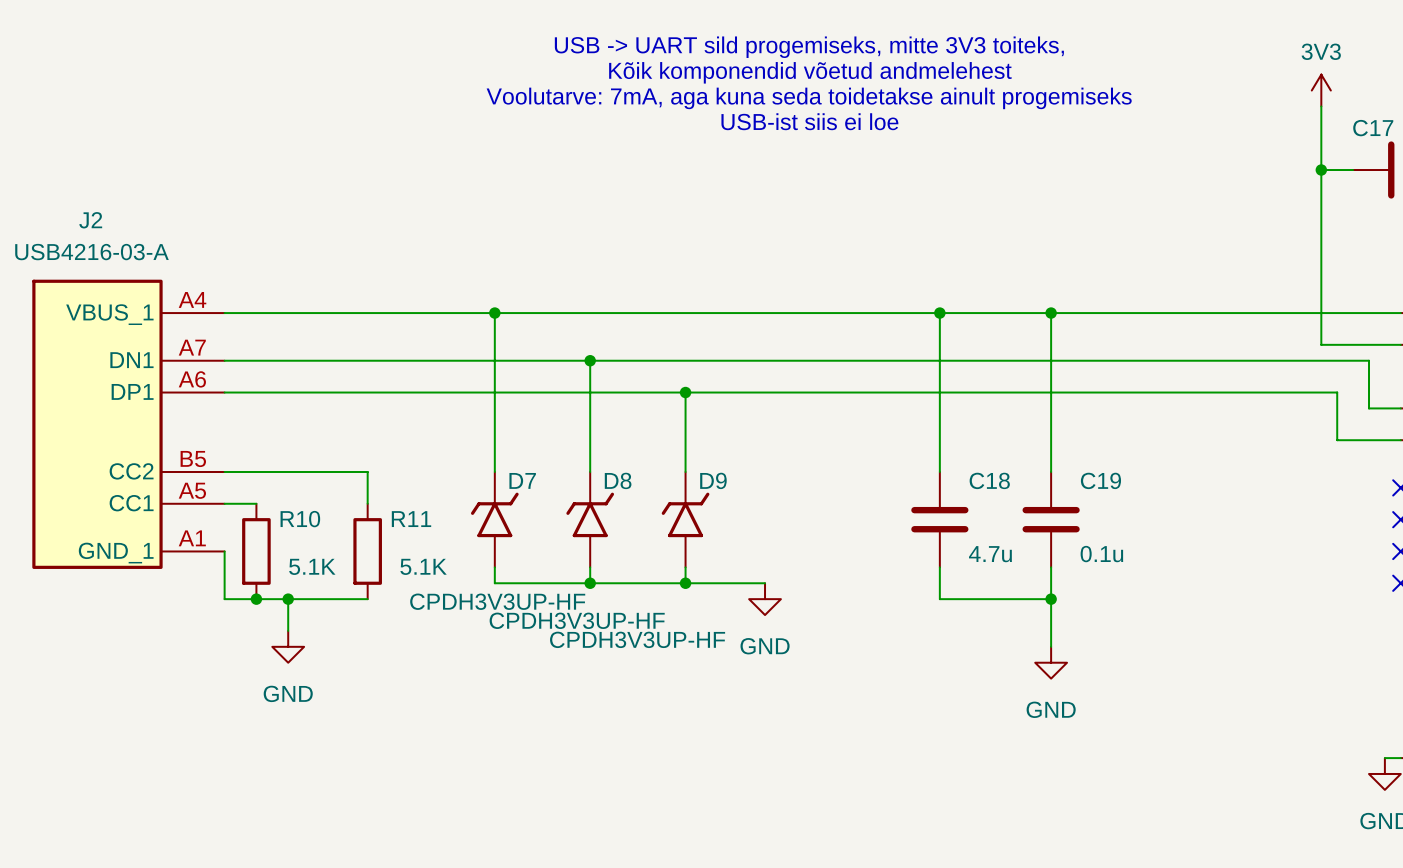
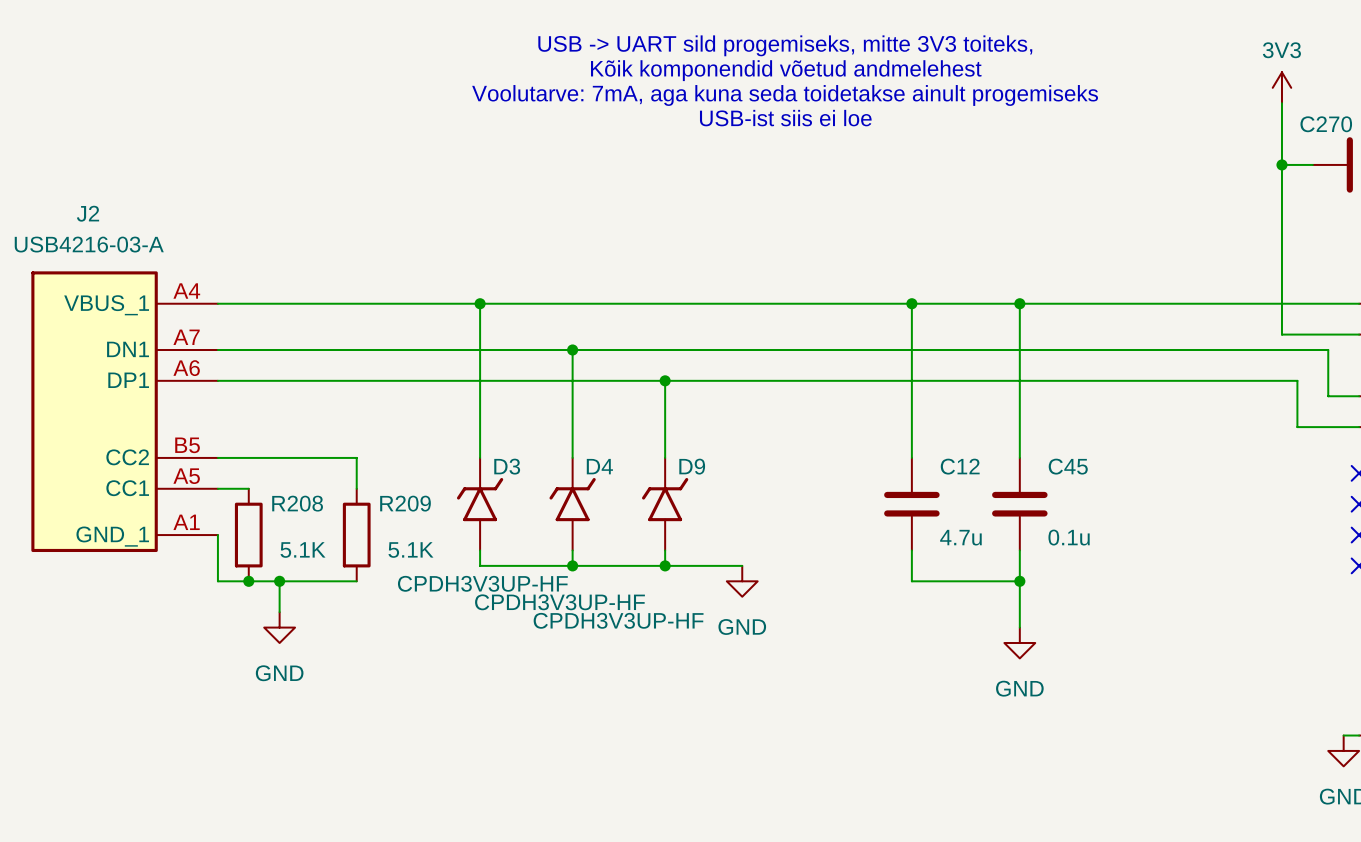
C17 name: C17 (1373, 128) -> C270 (1326, 124)
D7 name: D7 (522, 480) -> D3 (507, 466)
D8 name: D8 (618, 480) -> D4 (599, 466)
C18 name: C18 (989, 480) -> C12 (960, 466)
C19 name: C19 (1100, 480) -> C45 (1068, 466)
R10 name: R10 (300, 519) -> R208 (297, 503)
R11 name: R11 (411, 519) -> R209 (405, 503)

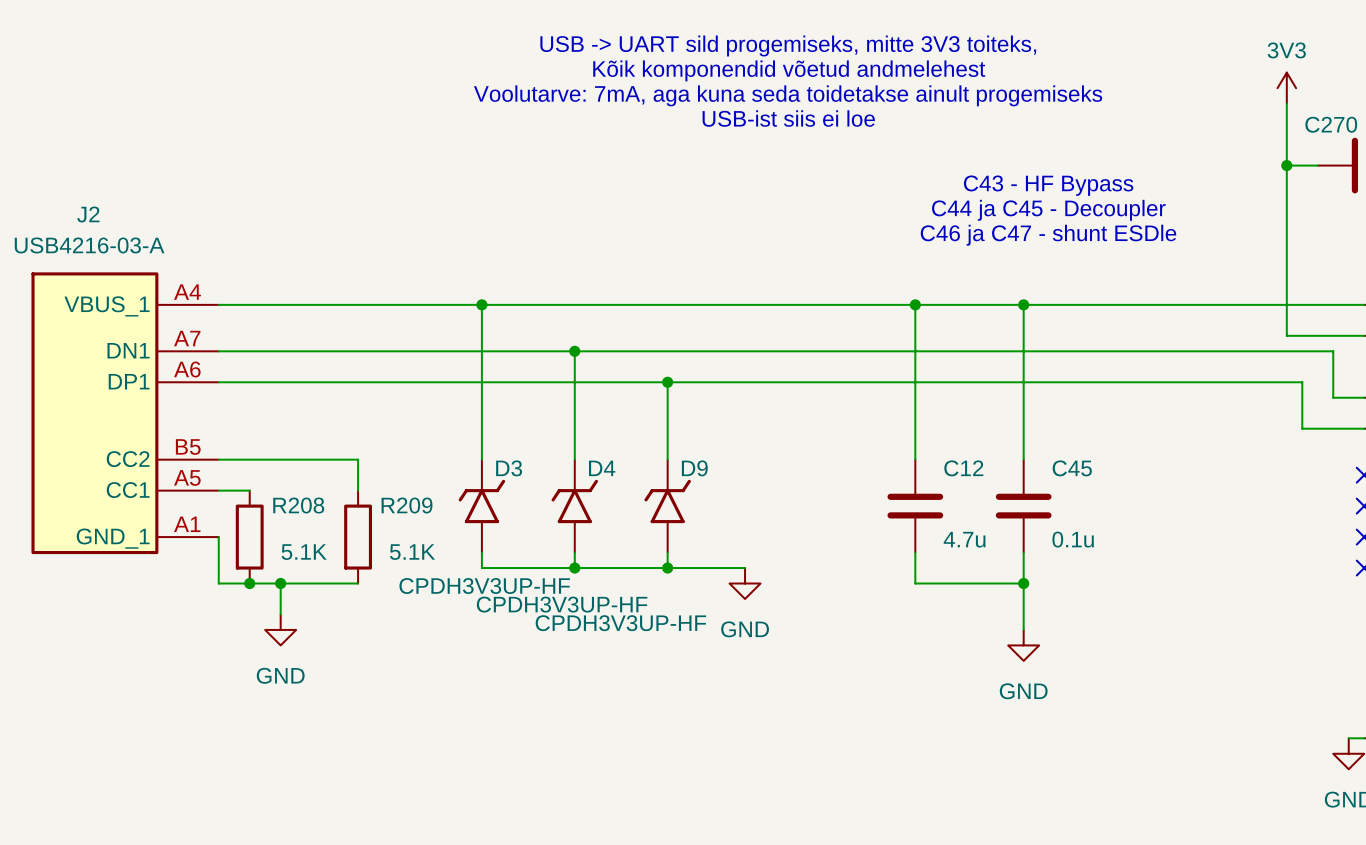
text: none -> C43 - HF Bypass (1048, 185)
text: none -> C44 ja C45 - Decoupler (1048, 210)
text: none -> C46 ja C47 - shunt ESDle (1048, 235)

